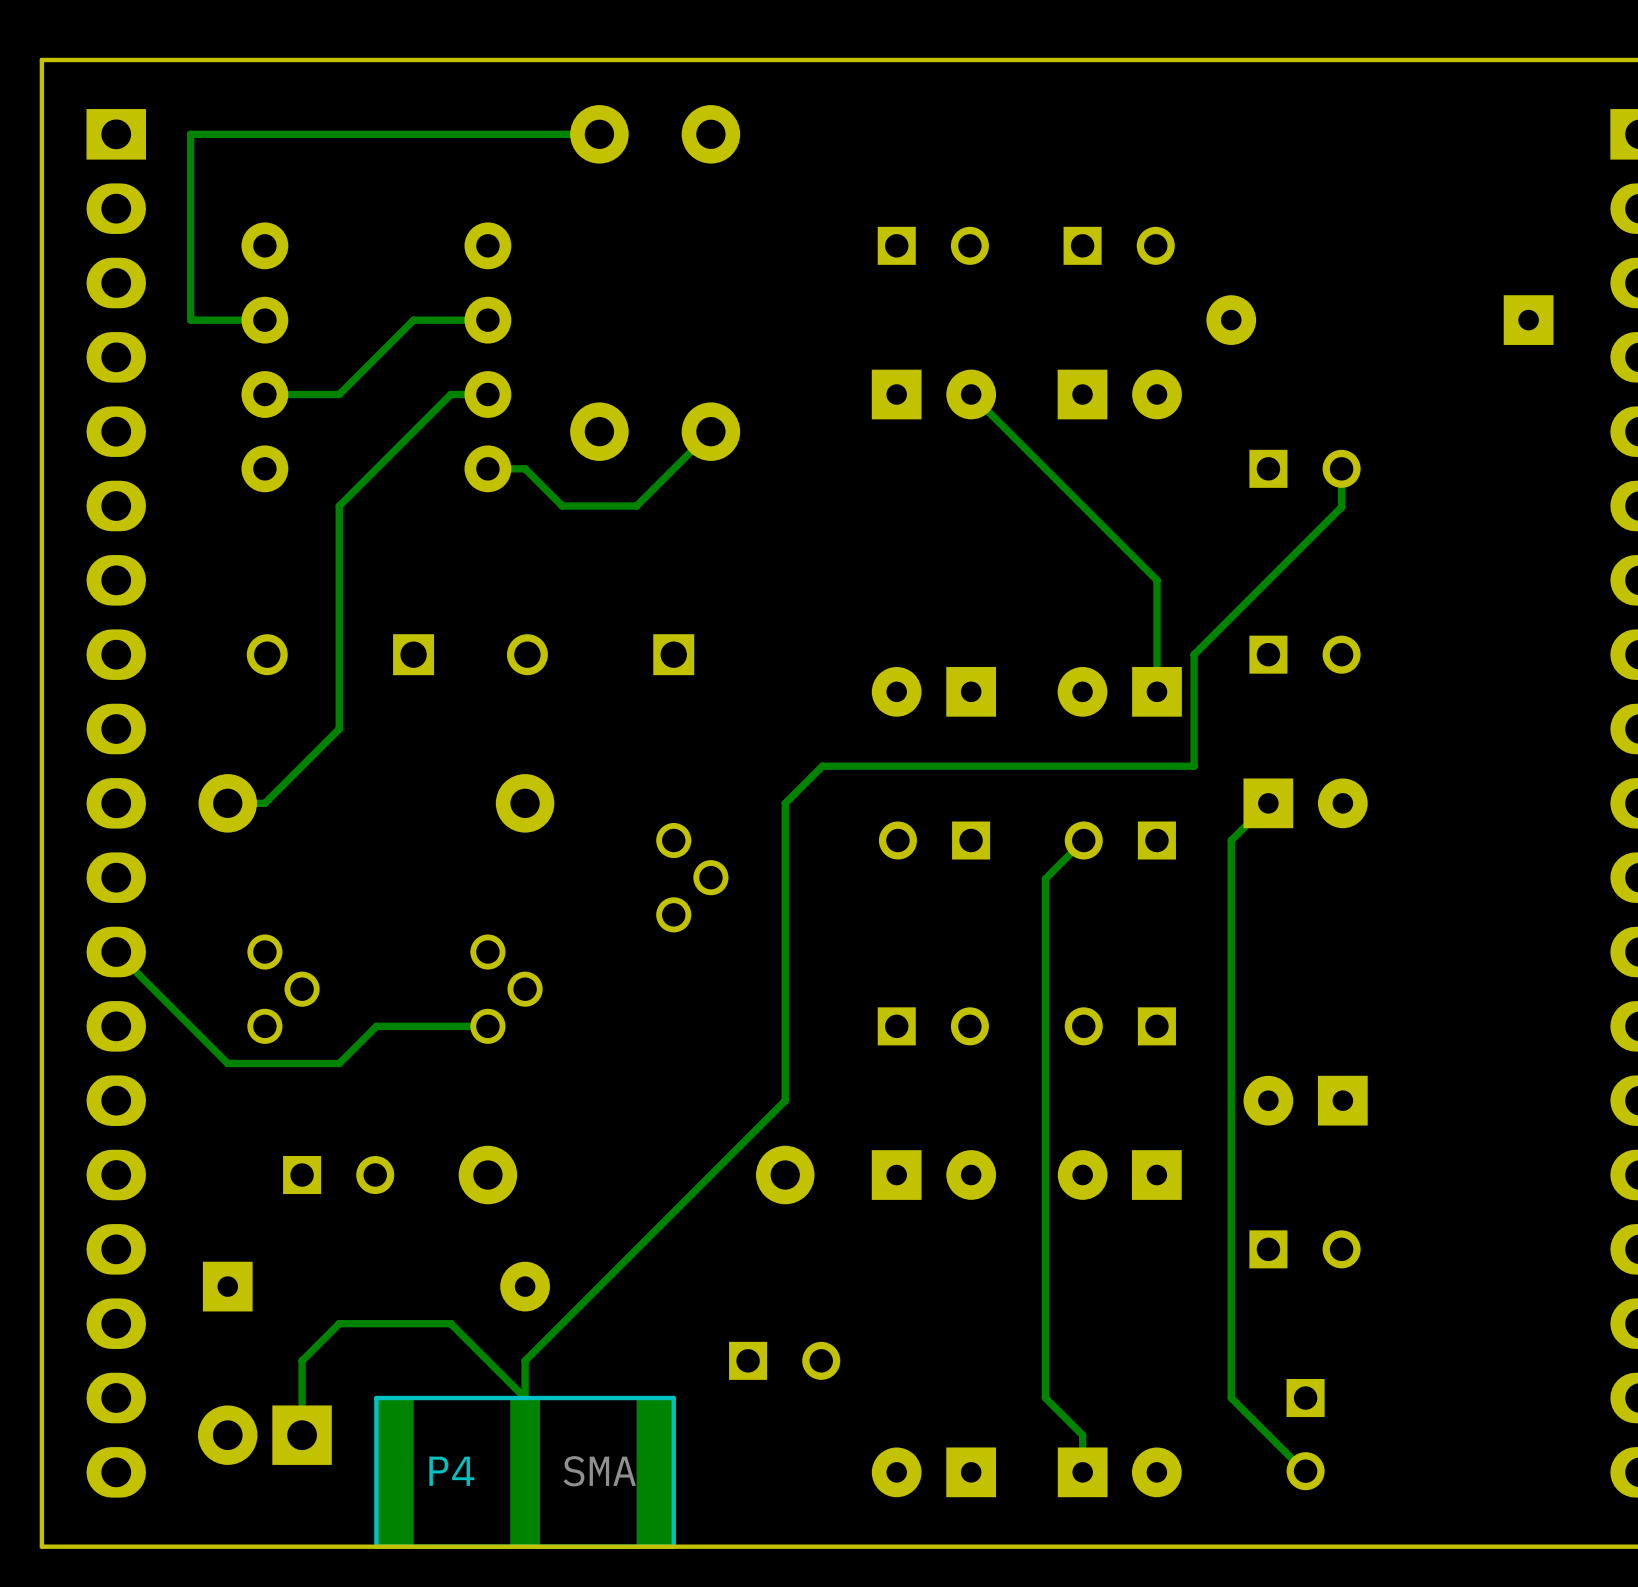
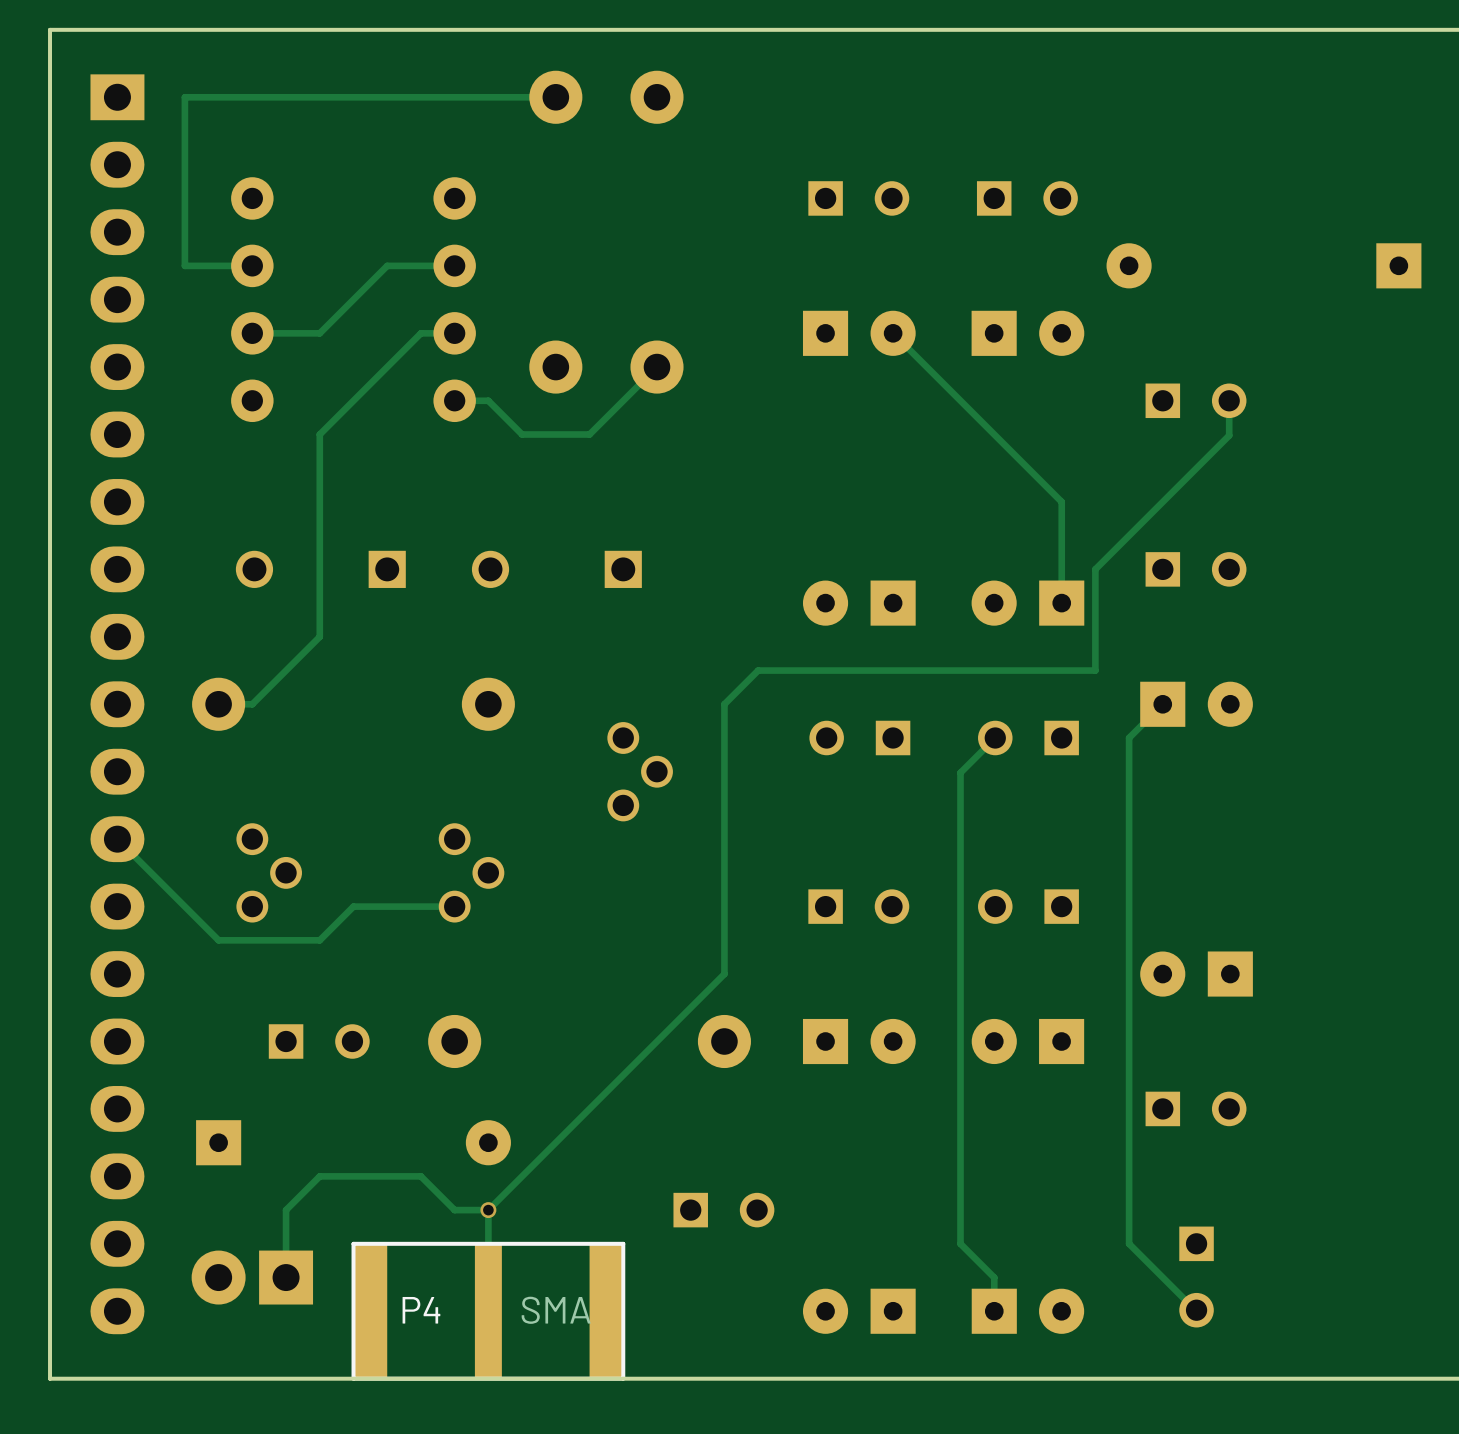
track: (487, 1360) (525, 1398) -> (454, 1210) (488, 1210)
via: none -> (488, 1210)

